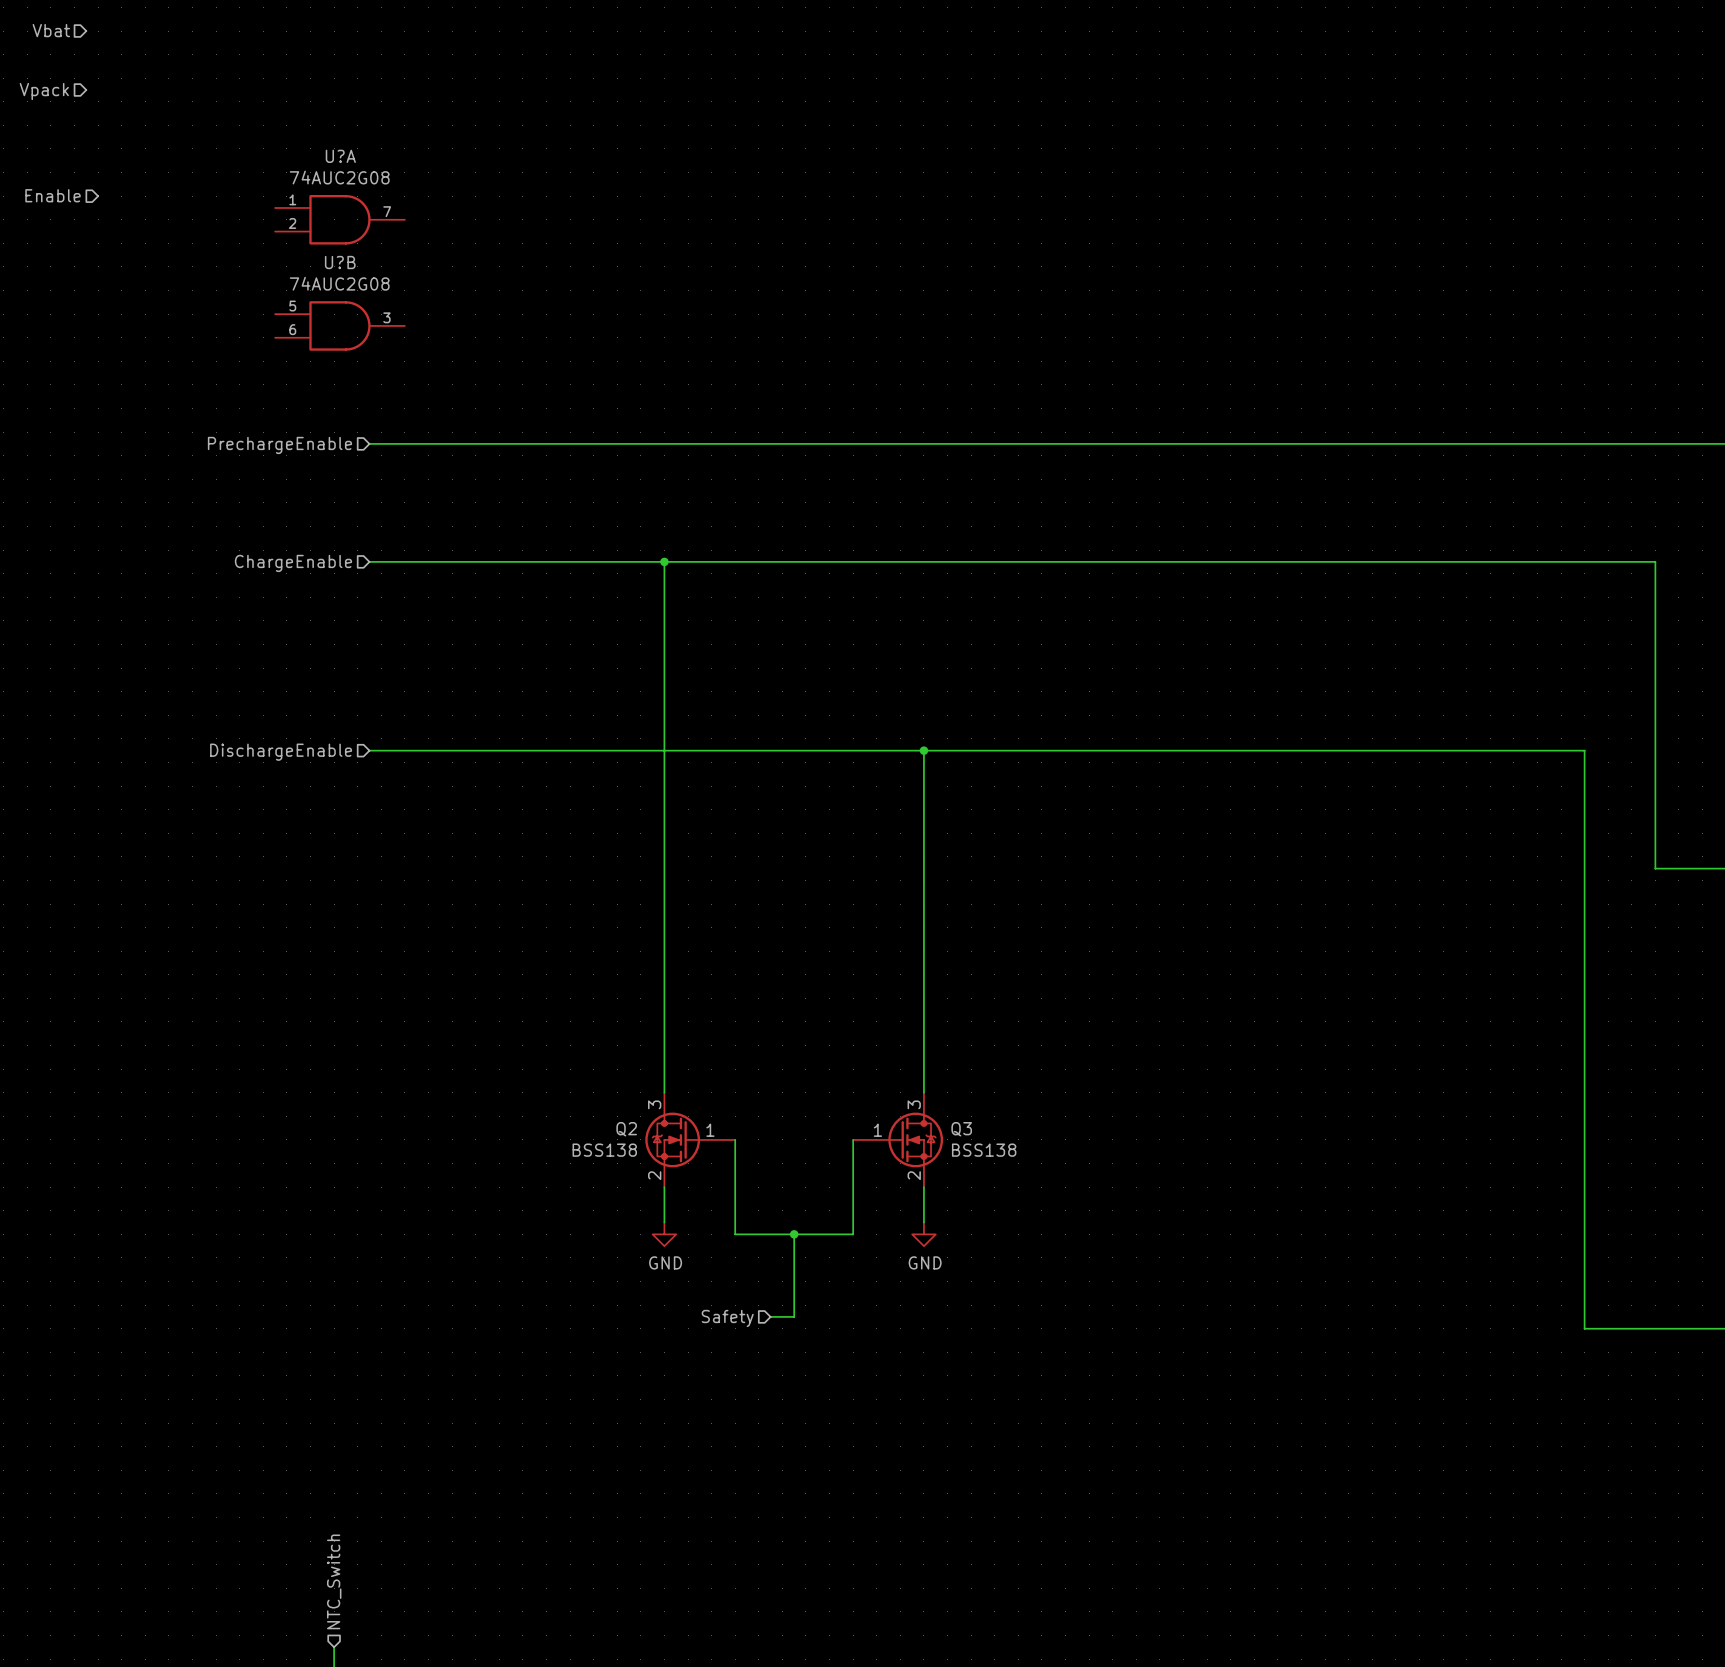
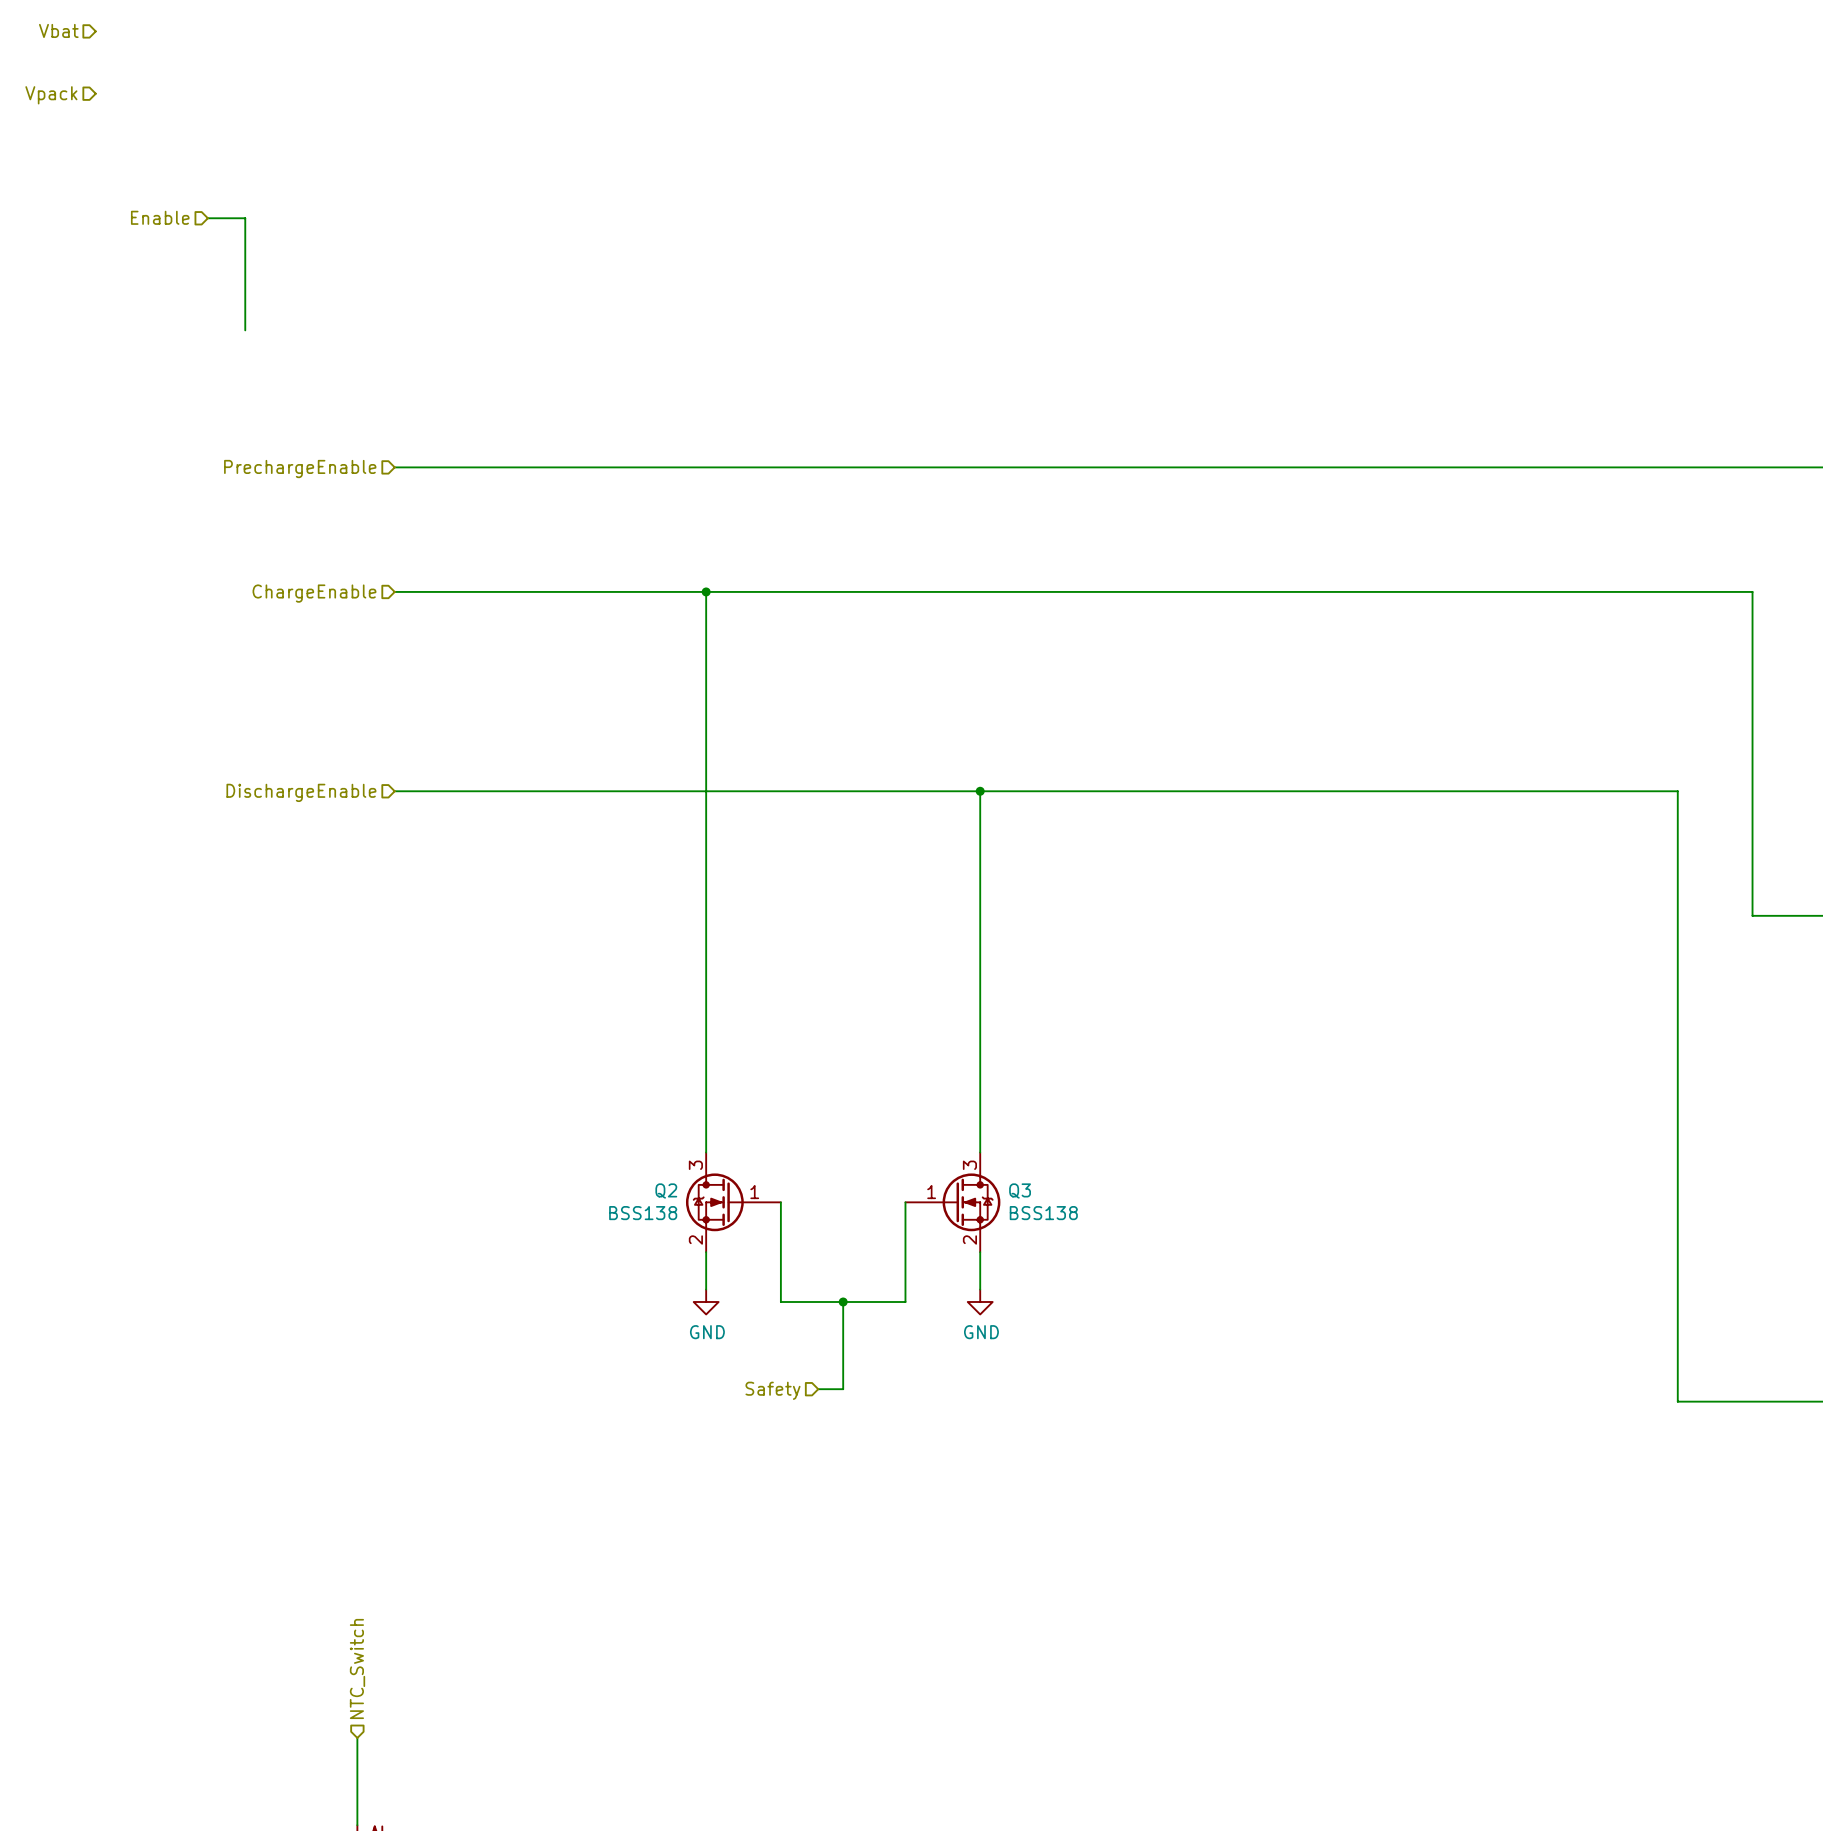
hierarchical label position: Enable (53, 195) -> Enable (160, 217)
wire: none -> (207, 218) (245, 218) (245, 330)
U?A: 74AUC2G08 (339, 219) -> none
U?B: 74AUC2G08 (339, 325) -> none

